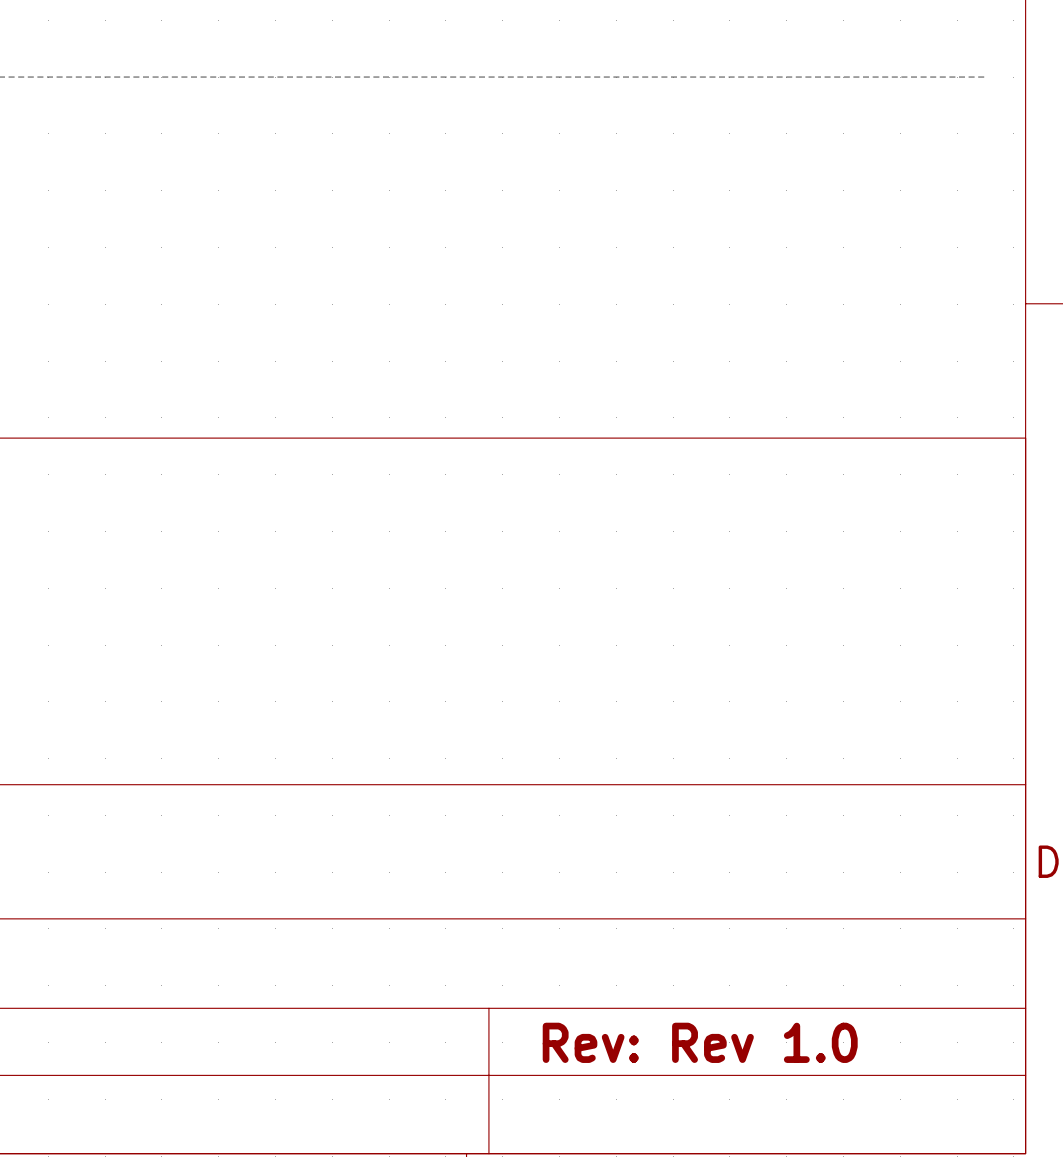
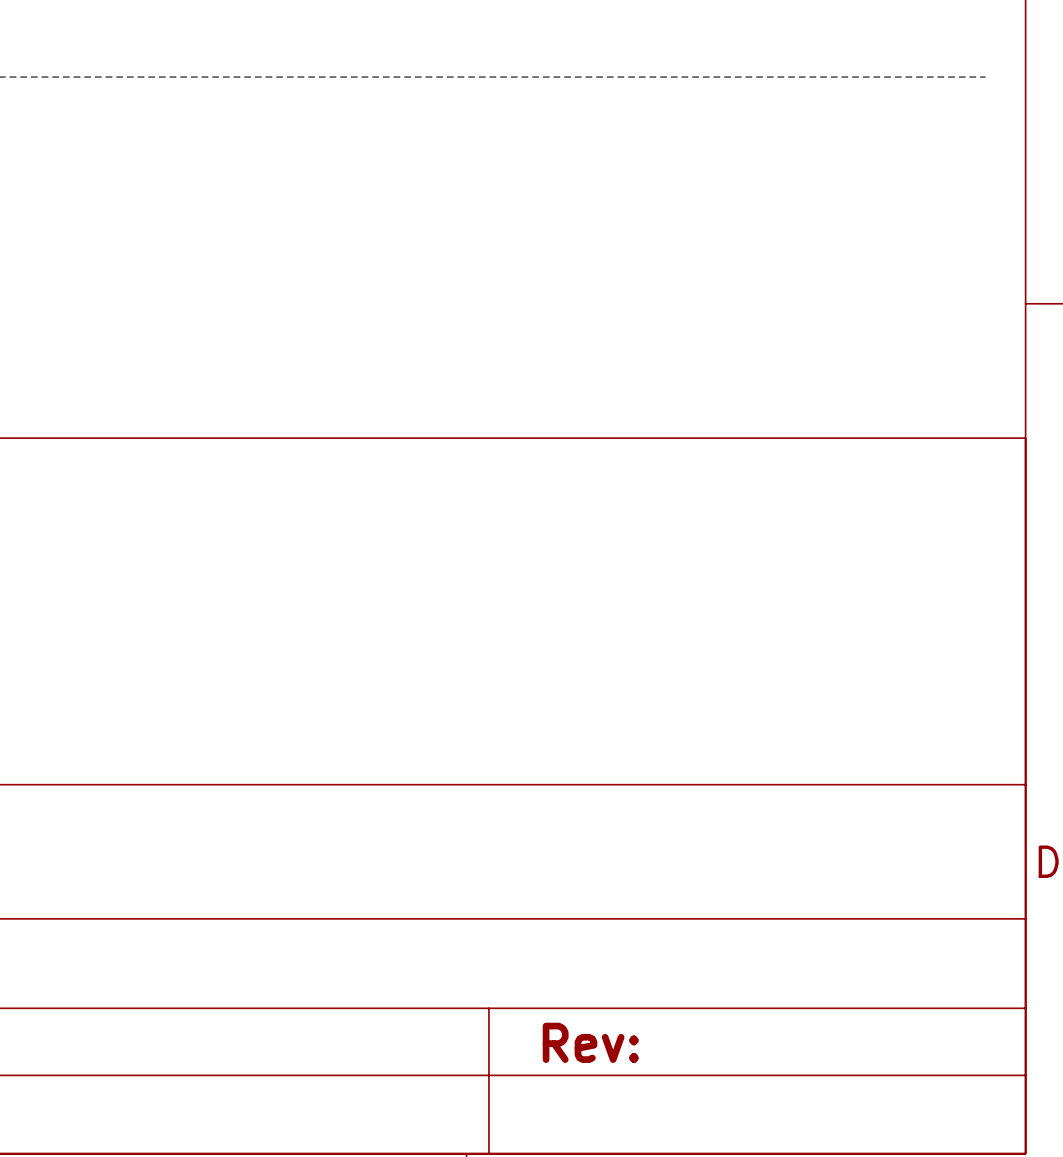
title block: Rev: Rev 1.0 (700, 1042) -> Rev: (590, 1042)

